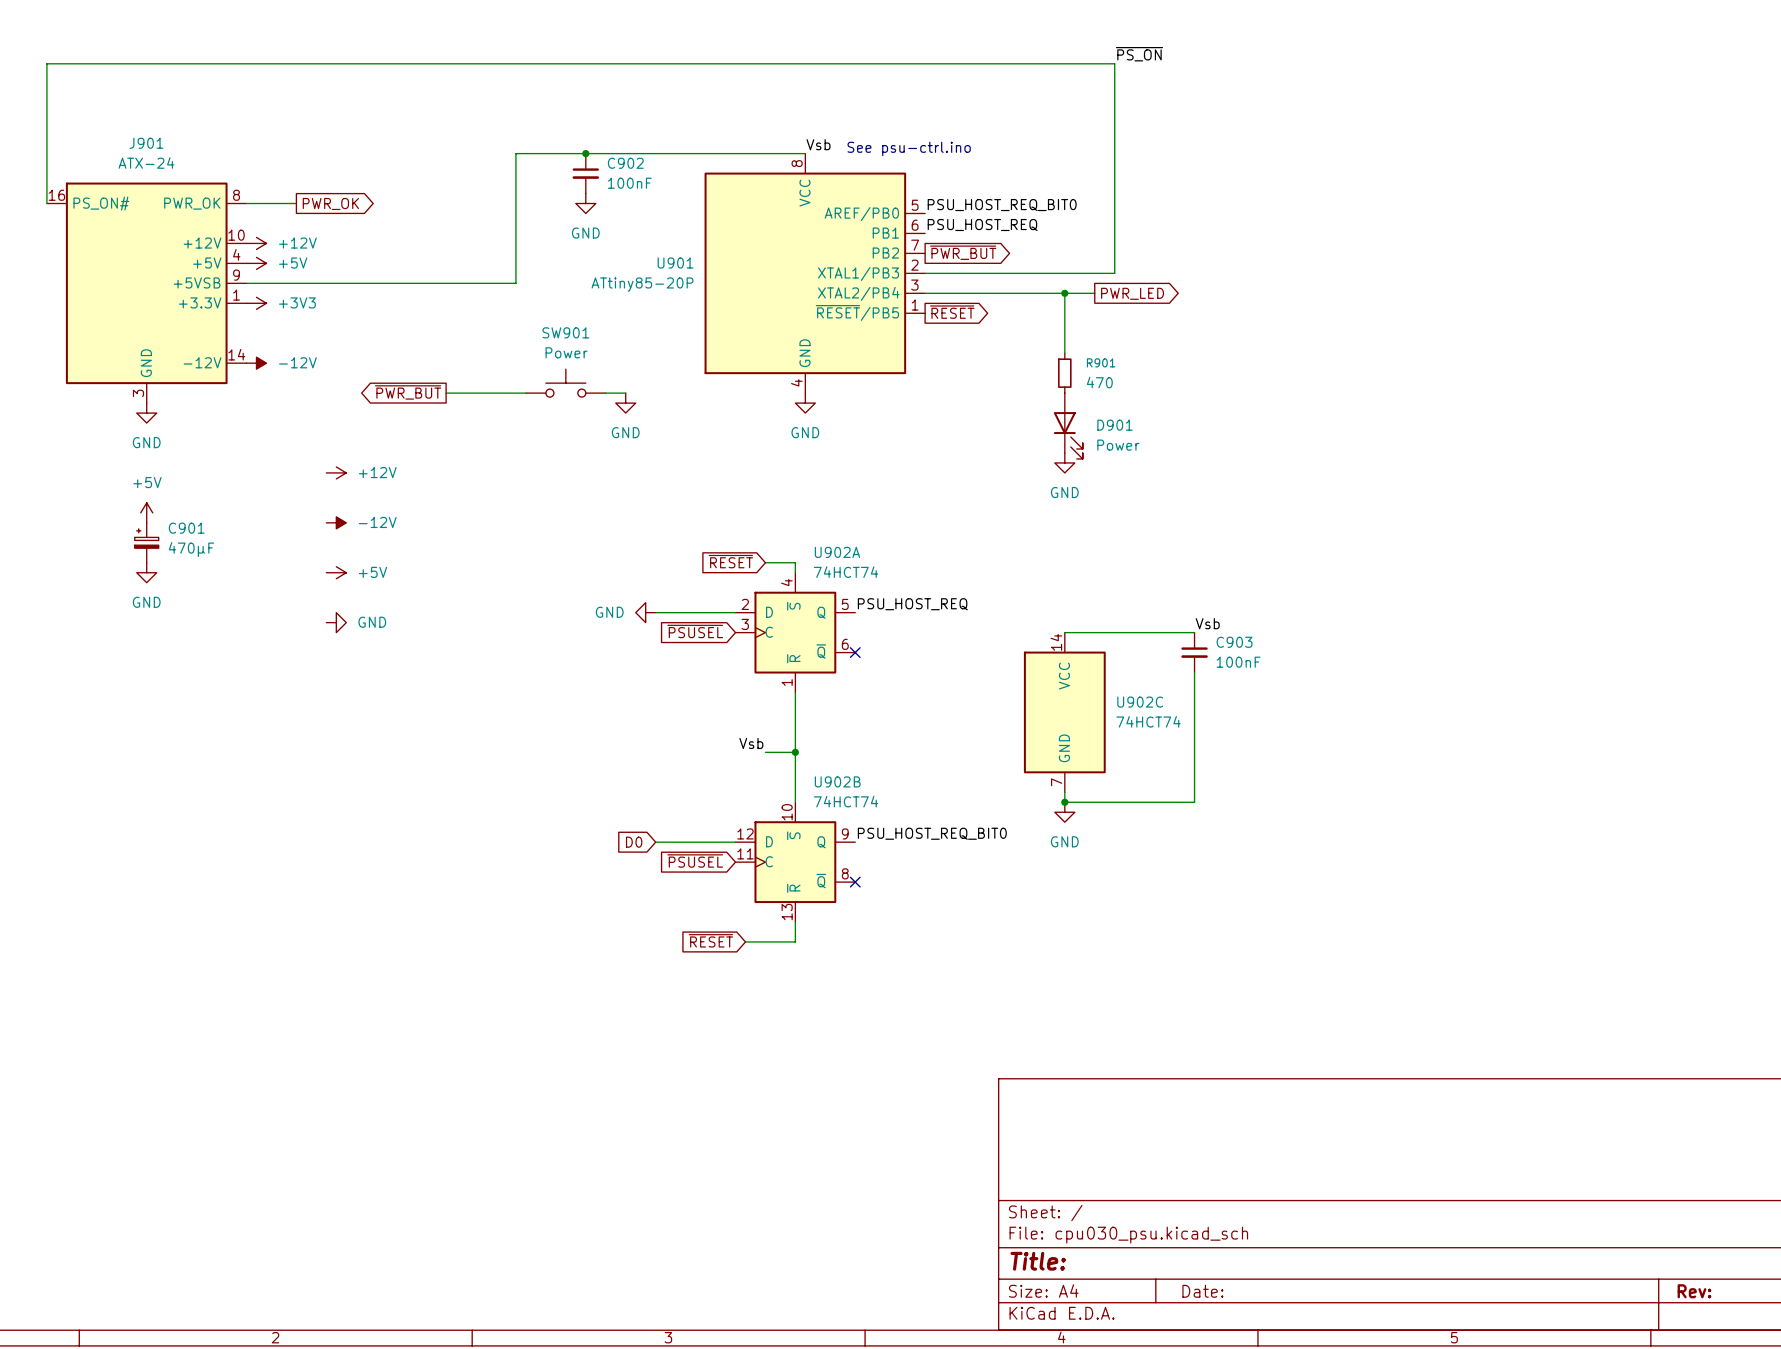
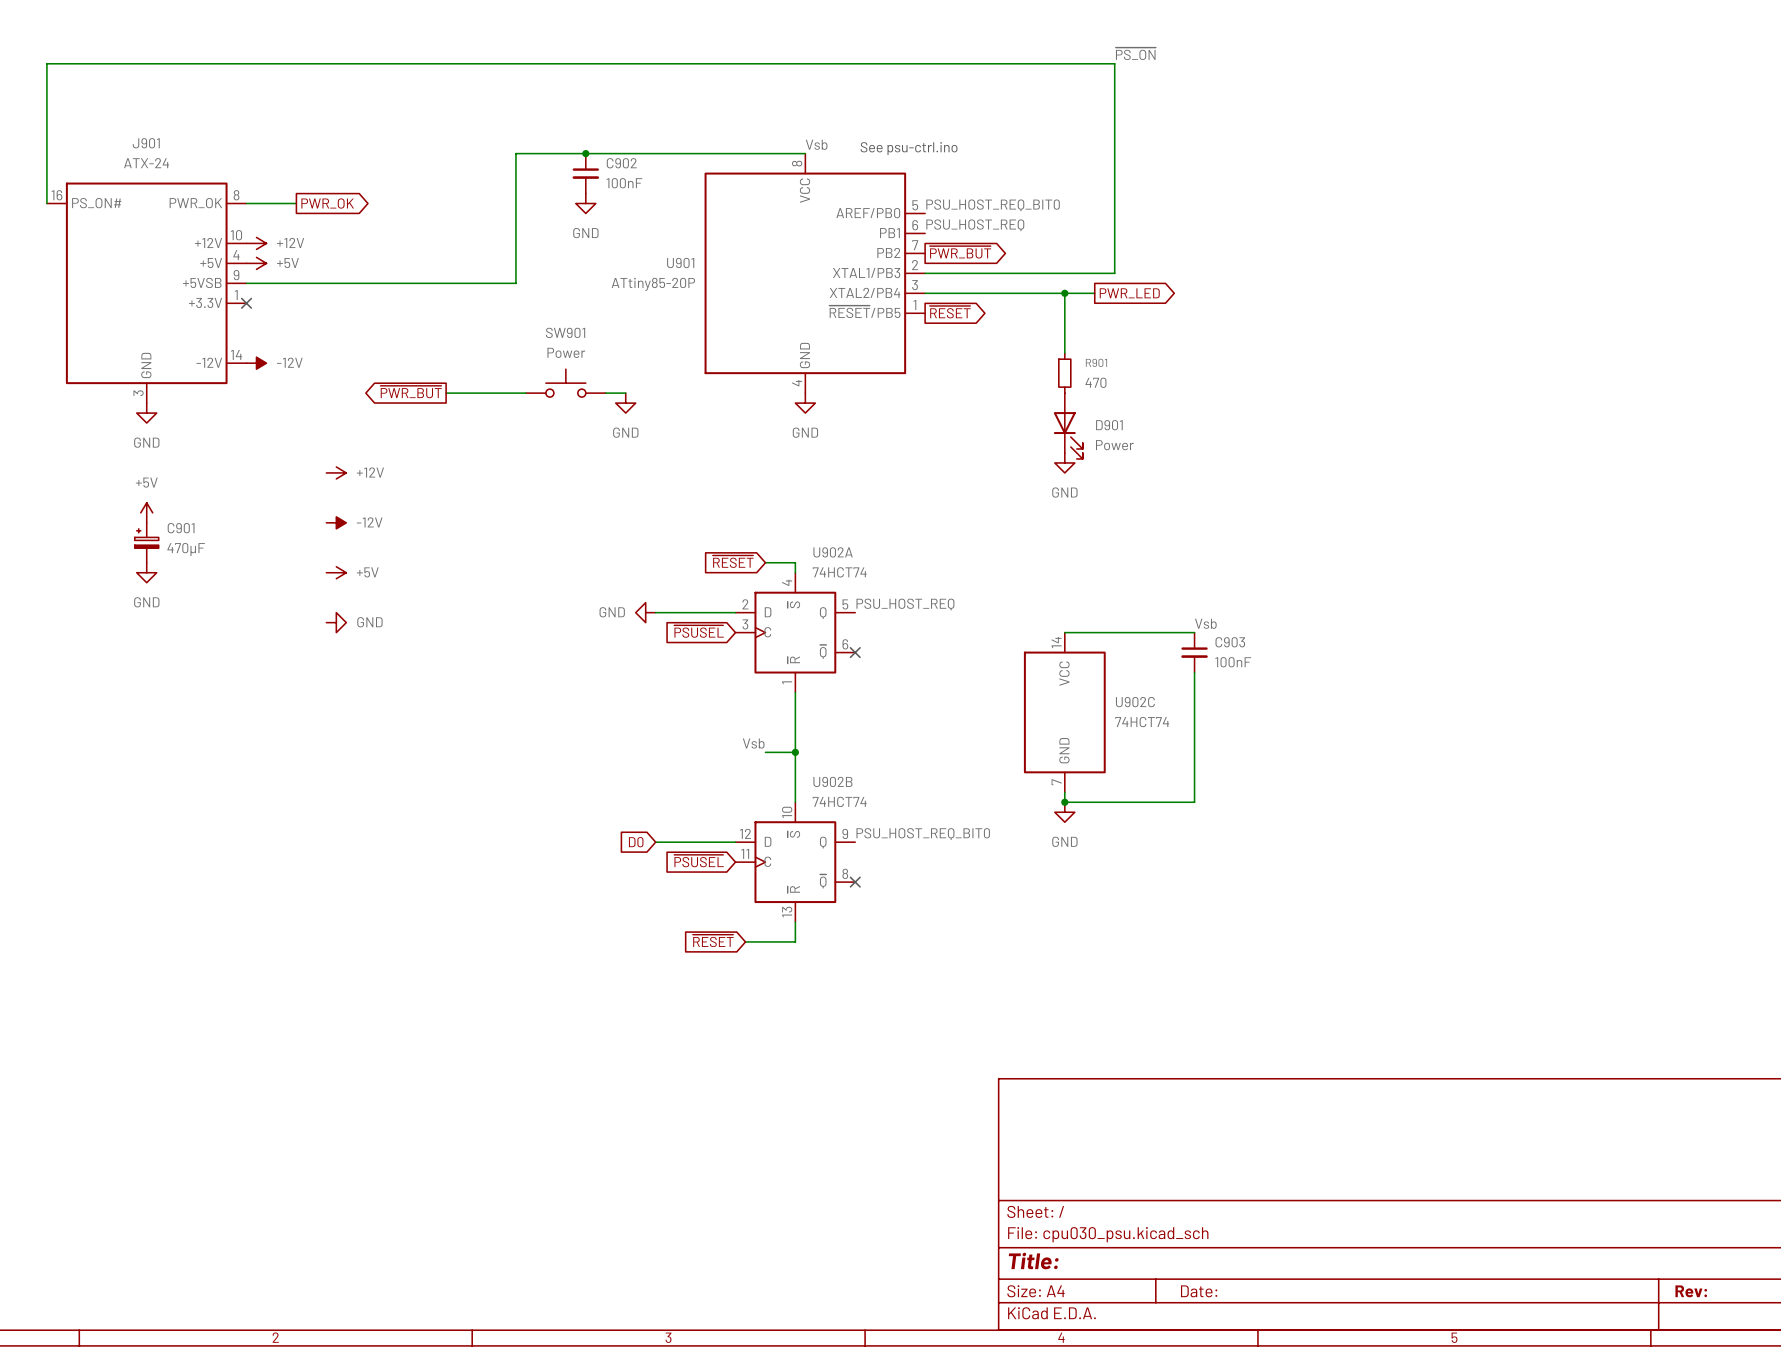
no-connect mark: none -> (246, 303)
power symbol: +3V3 (256, 303) -> none

